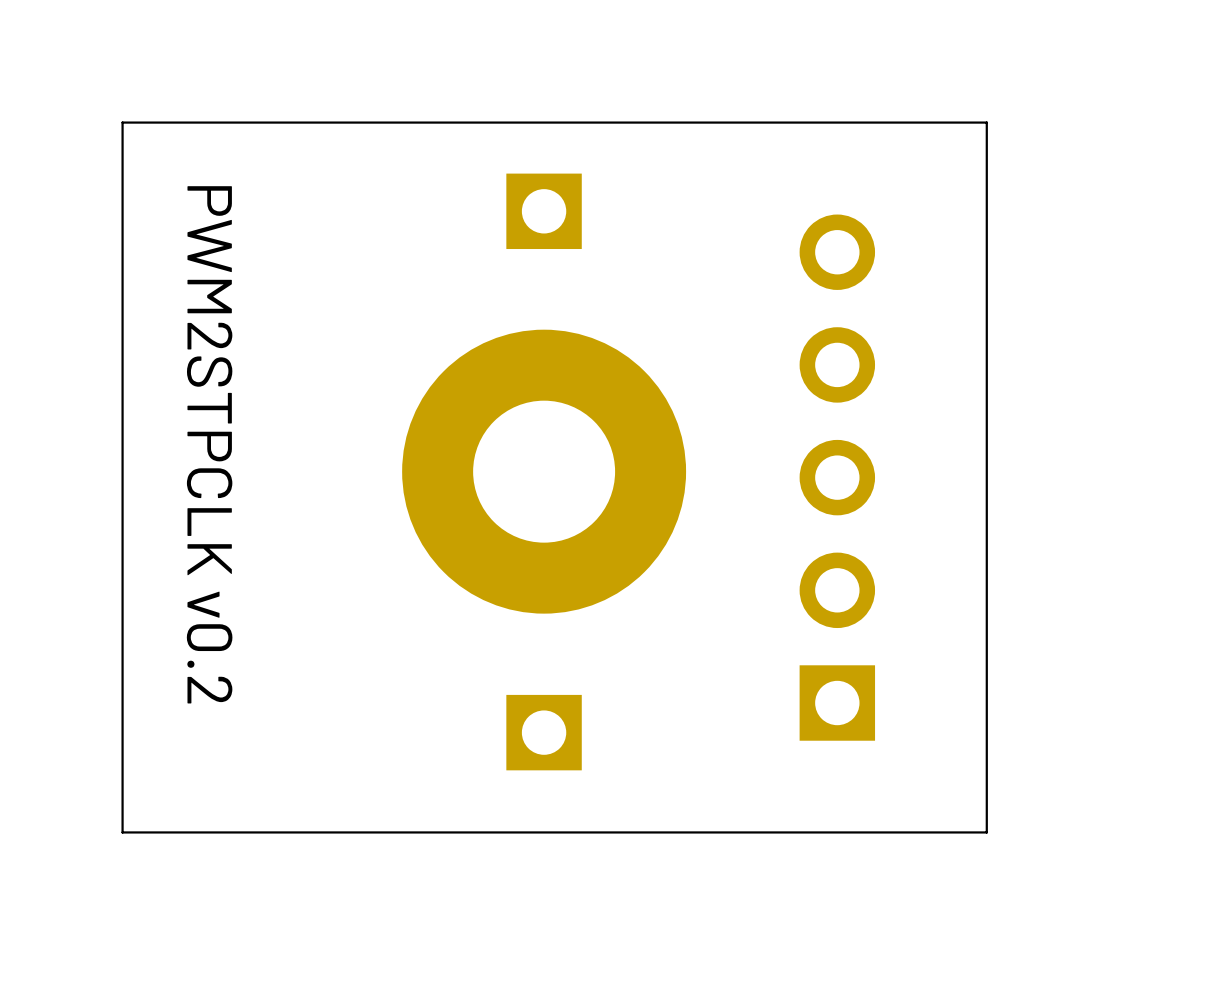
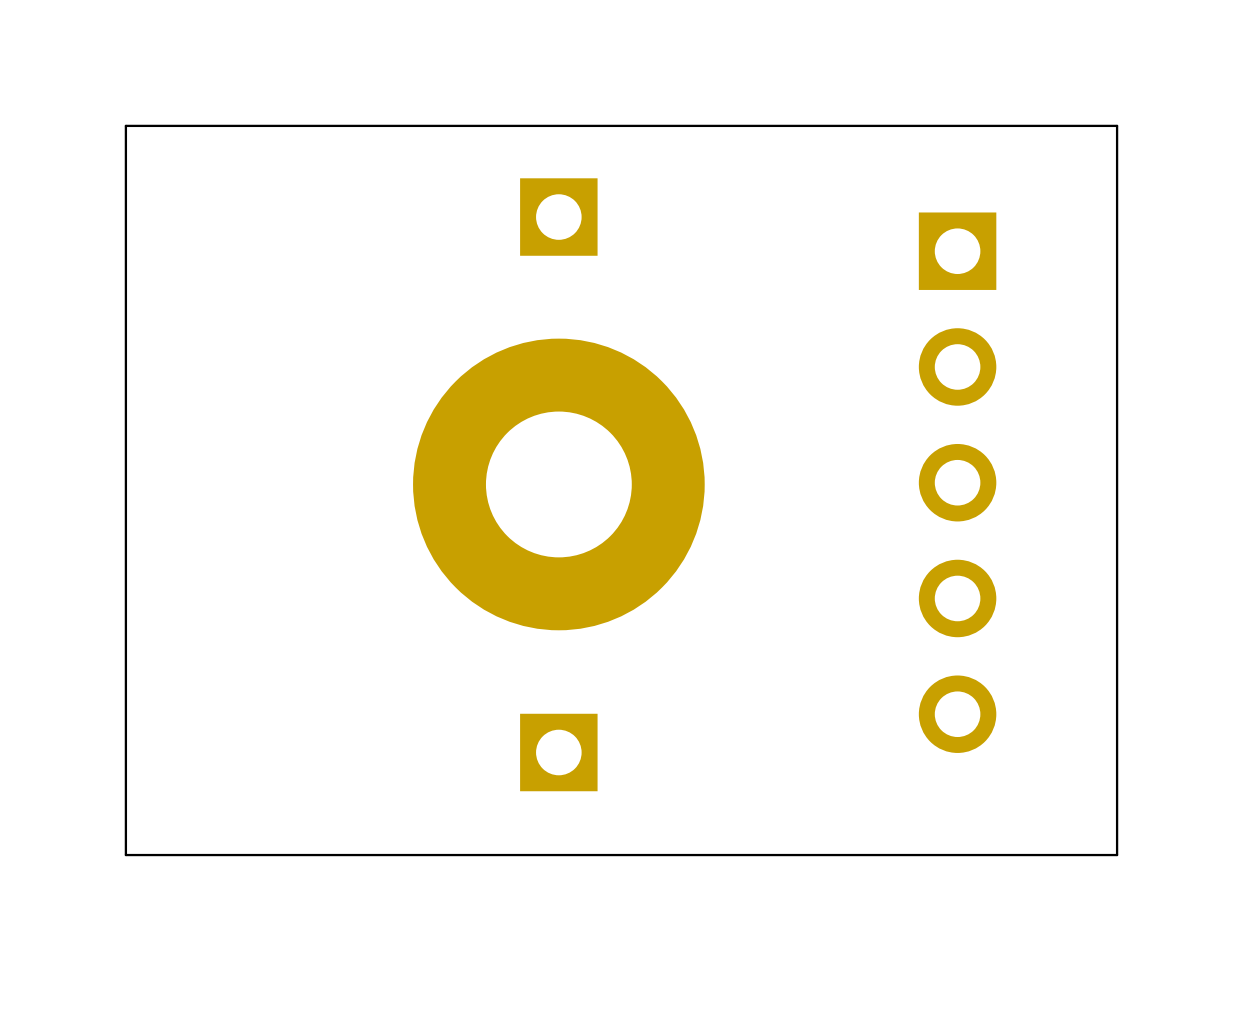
board edge: (986, 122) (986, 832) -> (1013, 125) (1117, 125) (1117, 855) (1013, 855)
text: PWM2STPCLK v0.2 (209, 444) -> none
part rotation: 0° (837, 477) -> 180° (957, 482)

